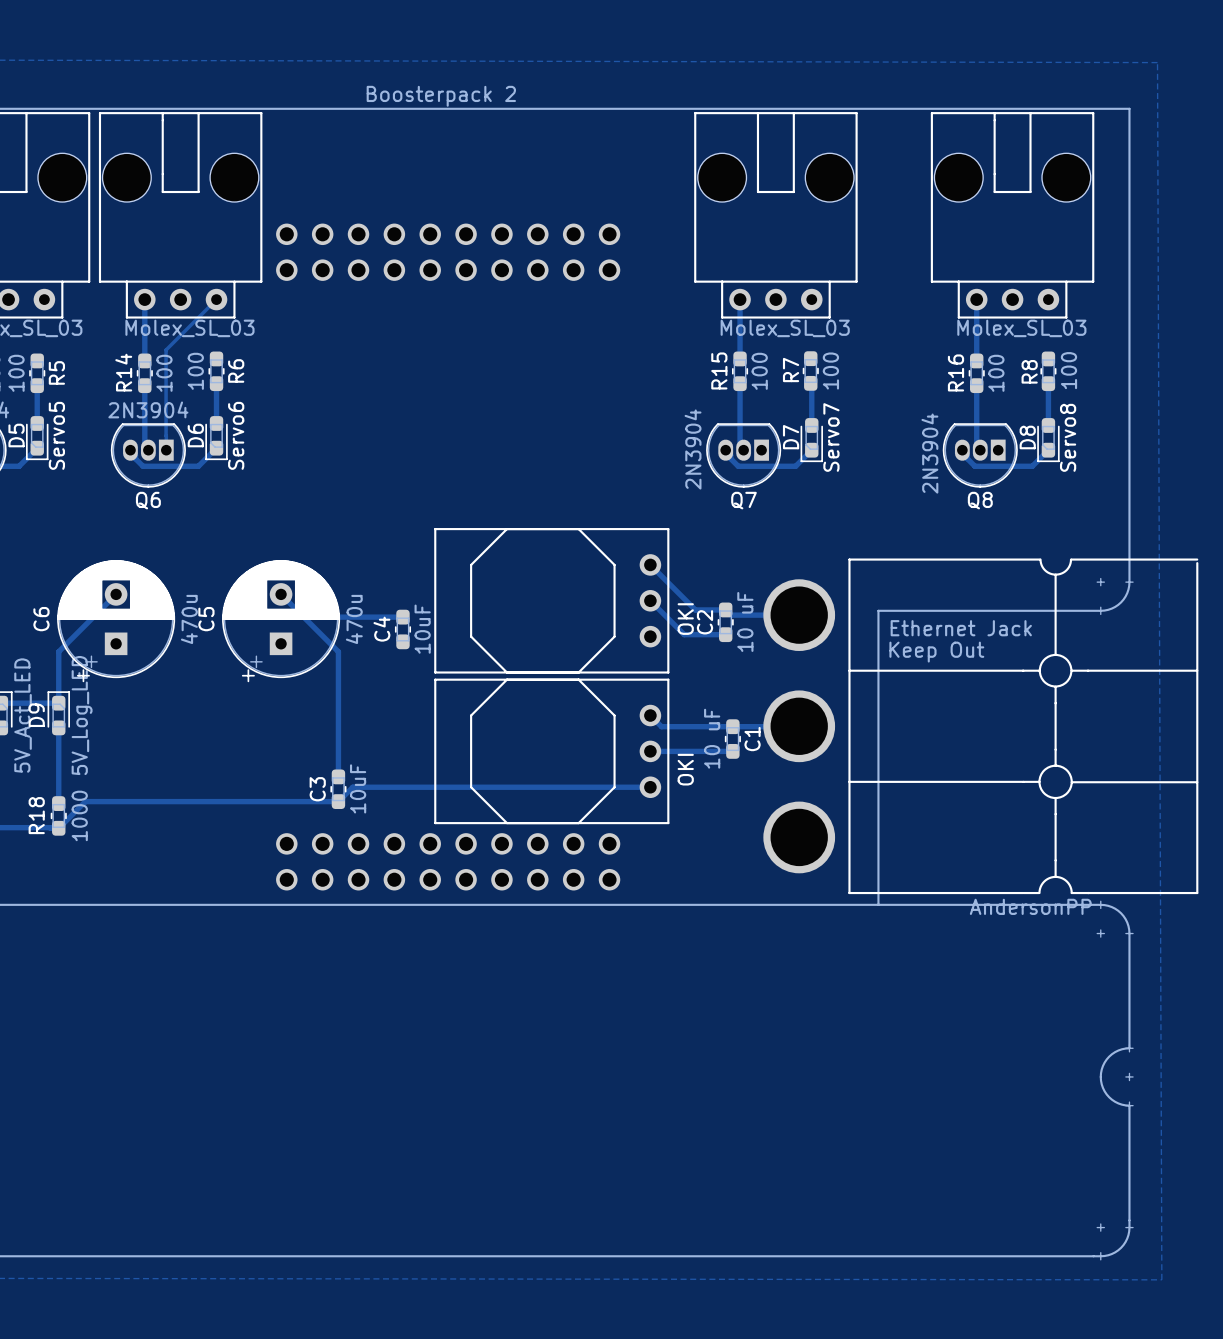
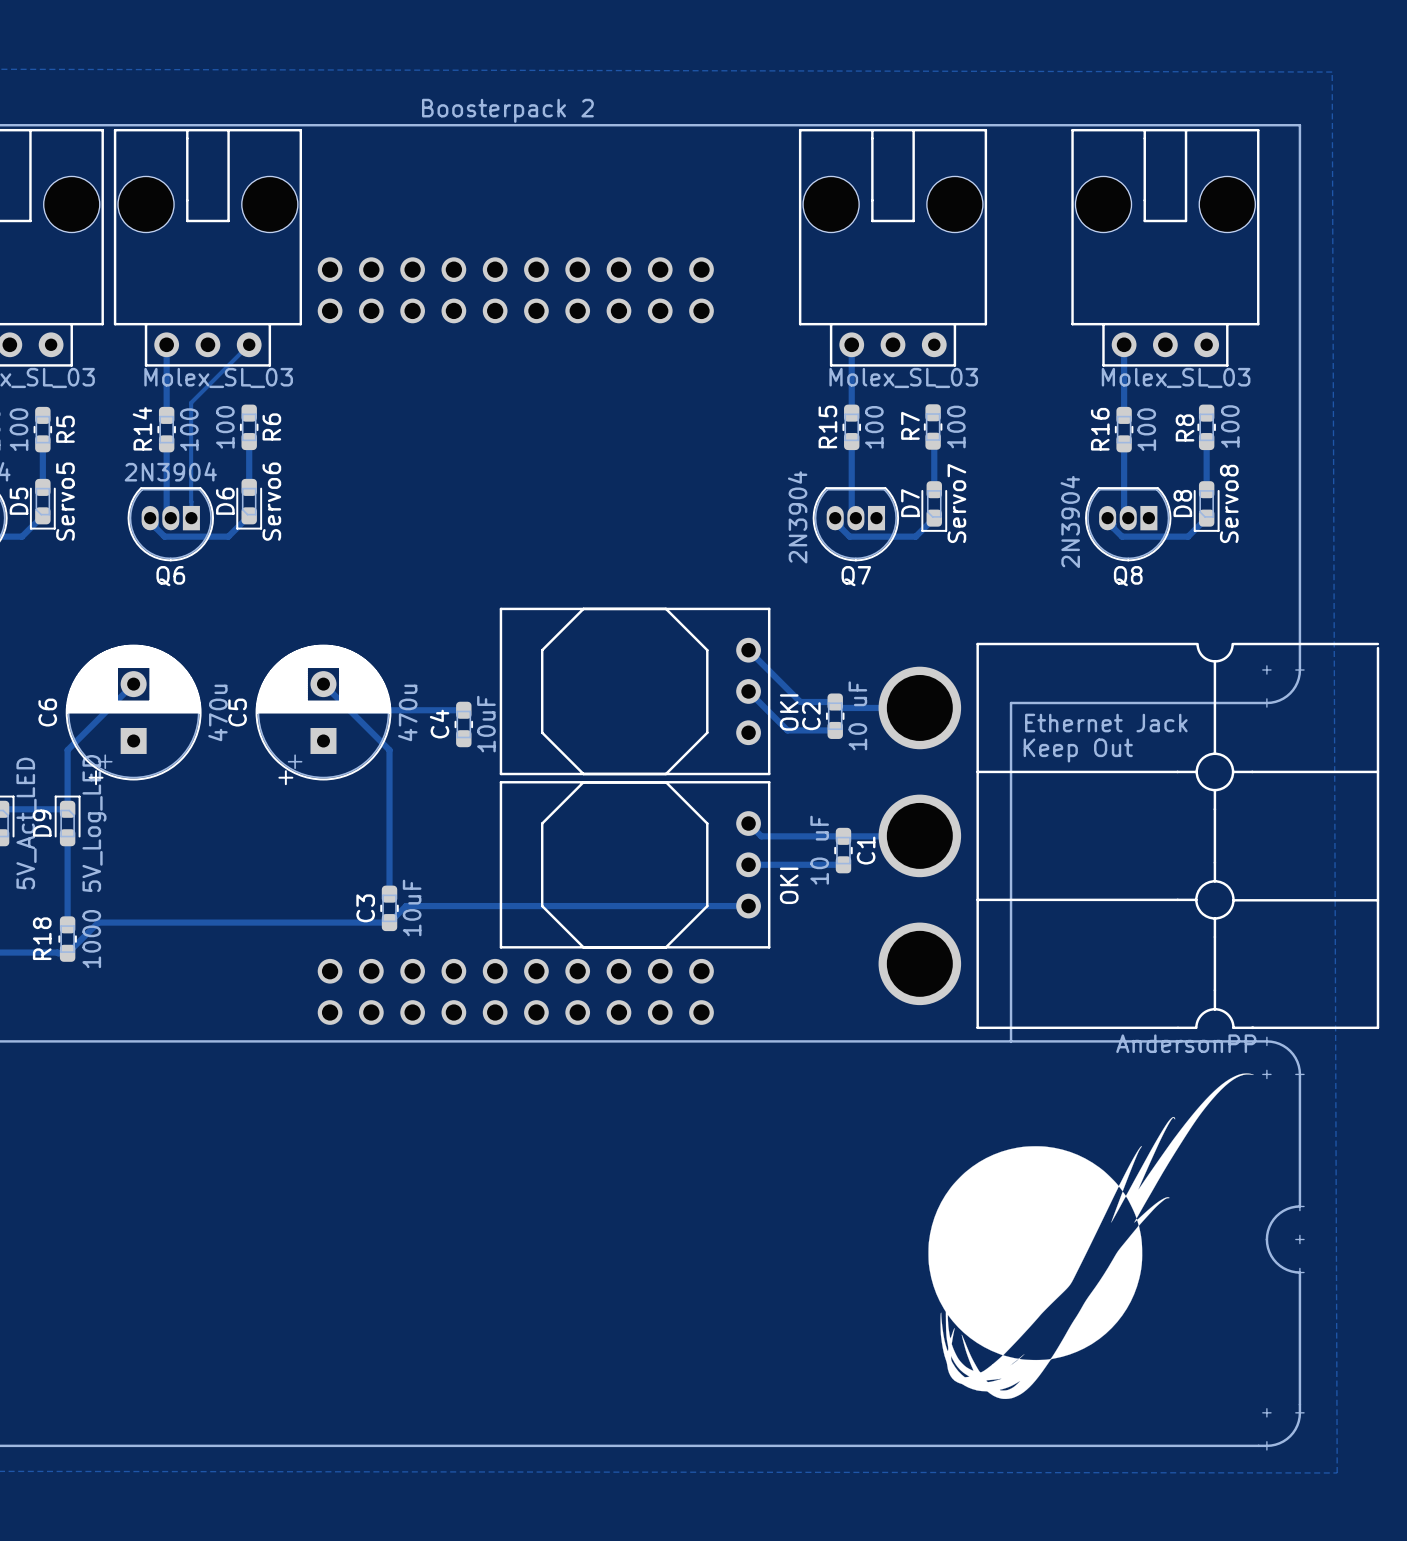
drawing: none -> [928, 1073, 1254, 1400]

